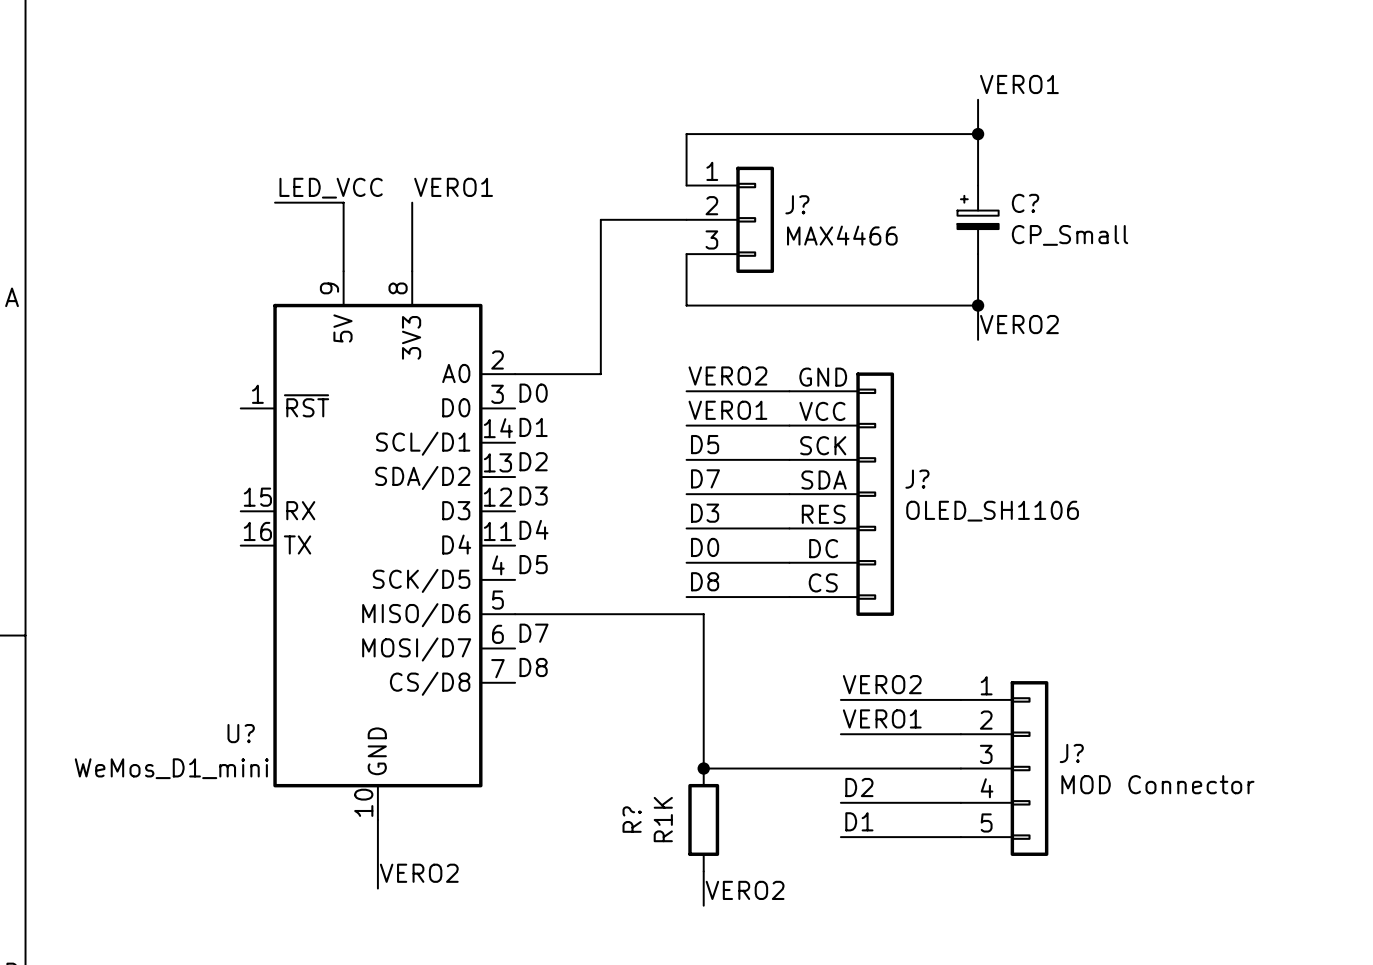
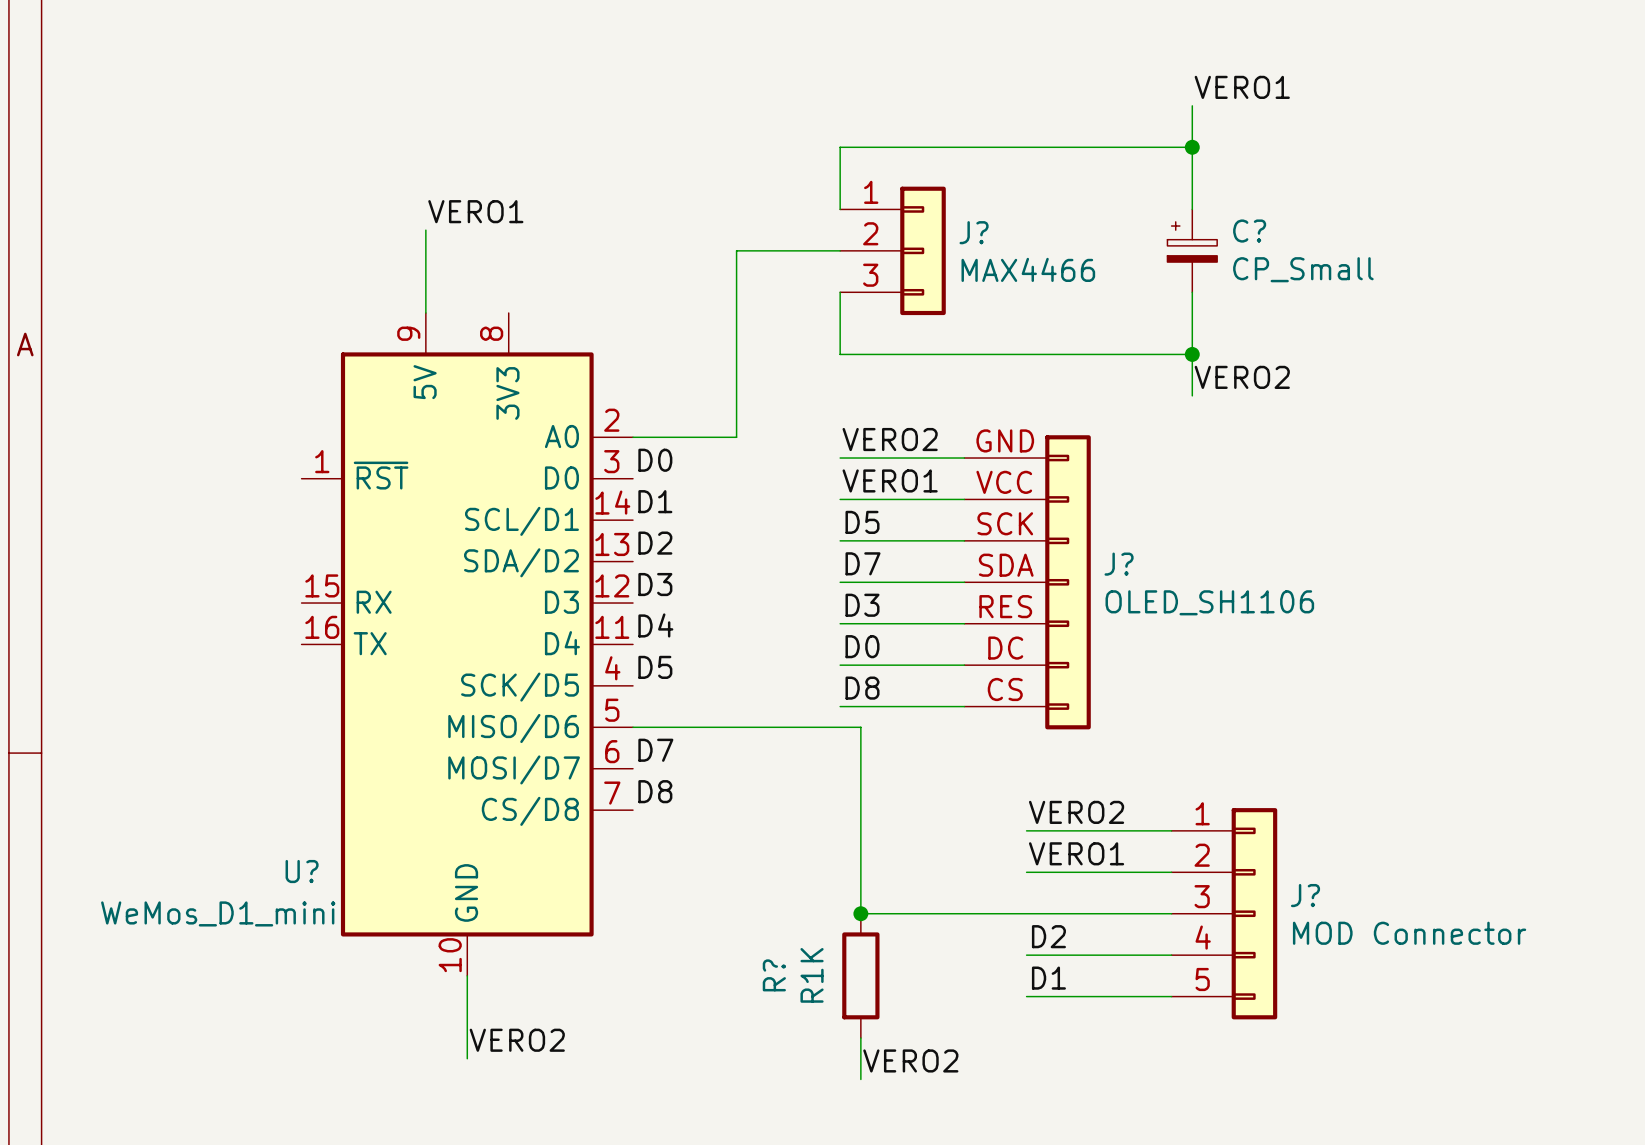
label position: VERO1 (453, 187) -> VERO1 (475, 211)
label: LED_VCC (331, 188) -> none
wire: (275, 202) (343, 202) -> none
wire: (412, 202) (412, 271) -> none

